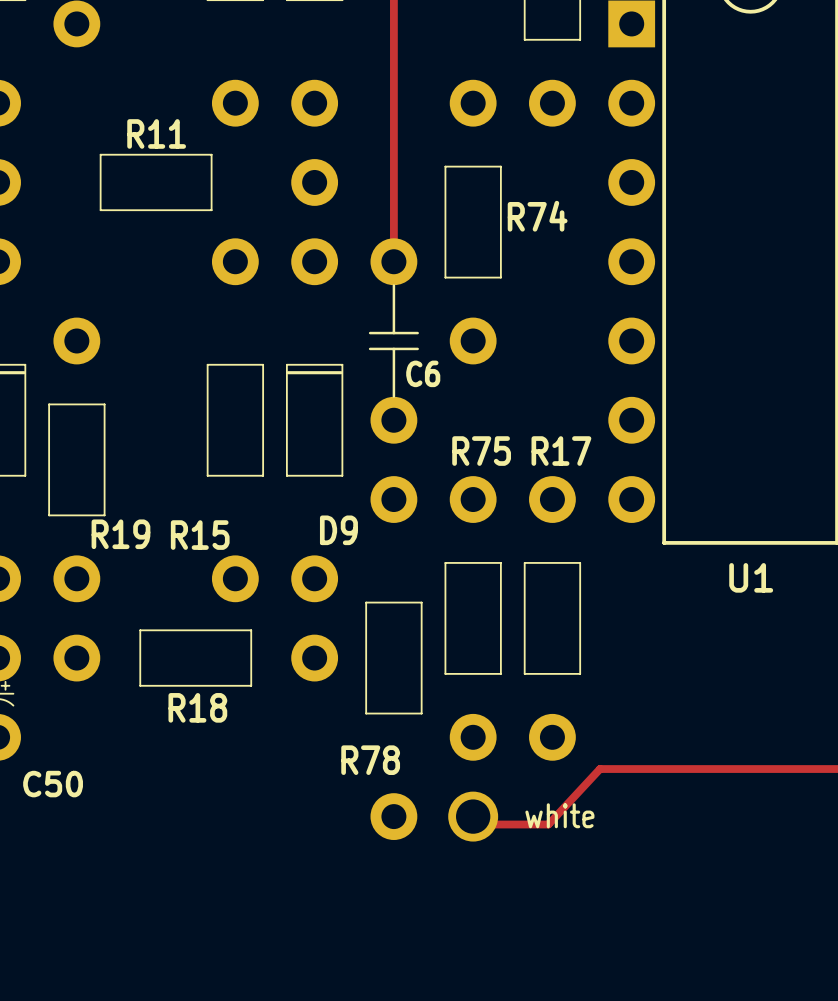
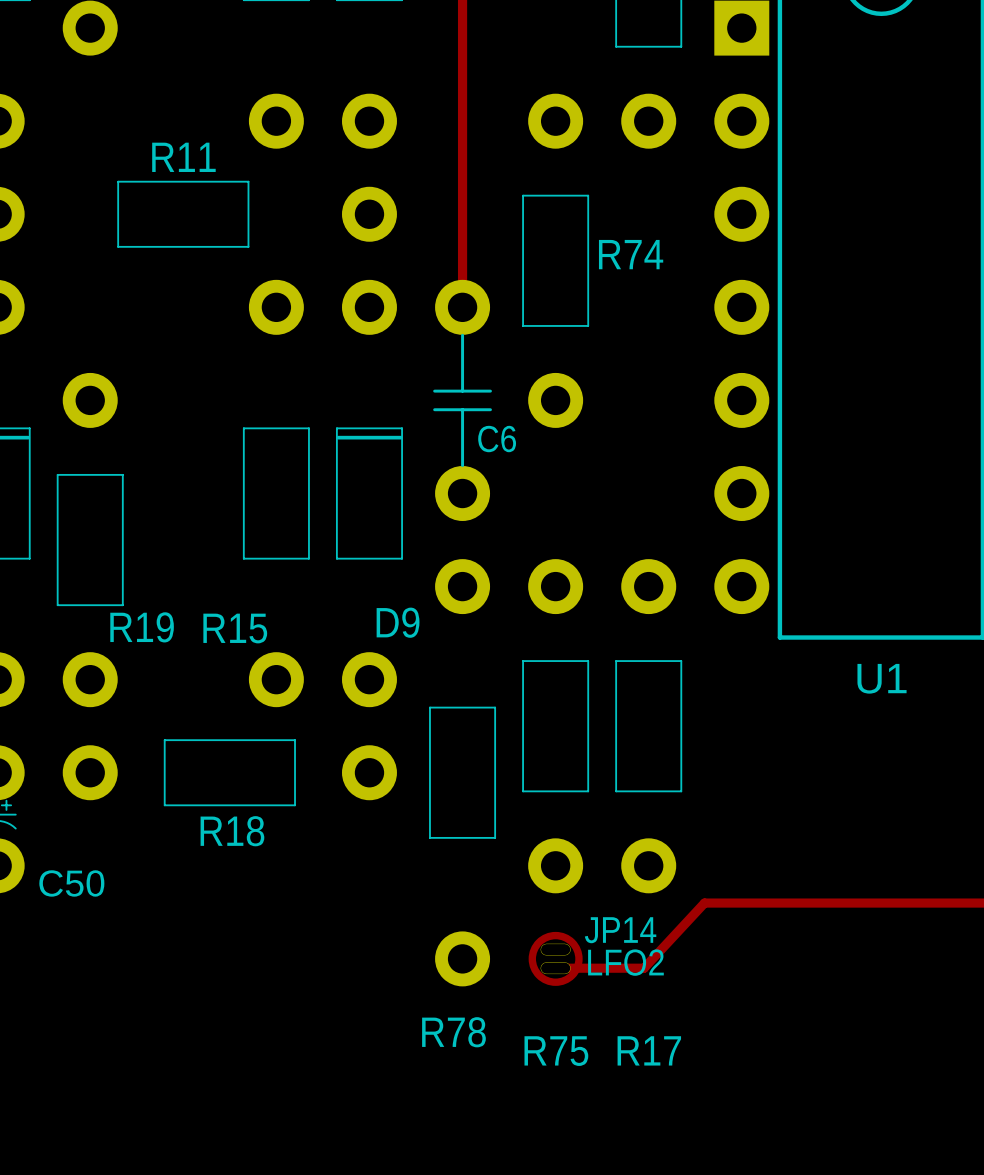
R75 name position: R75 (481, 451) -> R75 (556, 1051)
R17 name position: R17 (561, 451) -> R17 (649, 1050)
R78 name position: R78 (370, 760) -> R78 (453, 1032)
C50 name position: C50 (53, 784) -> C50 (71, 883)
part: white (473, 816) -> none
JP14: none -> LFO2 (555, 958)

